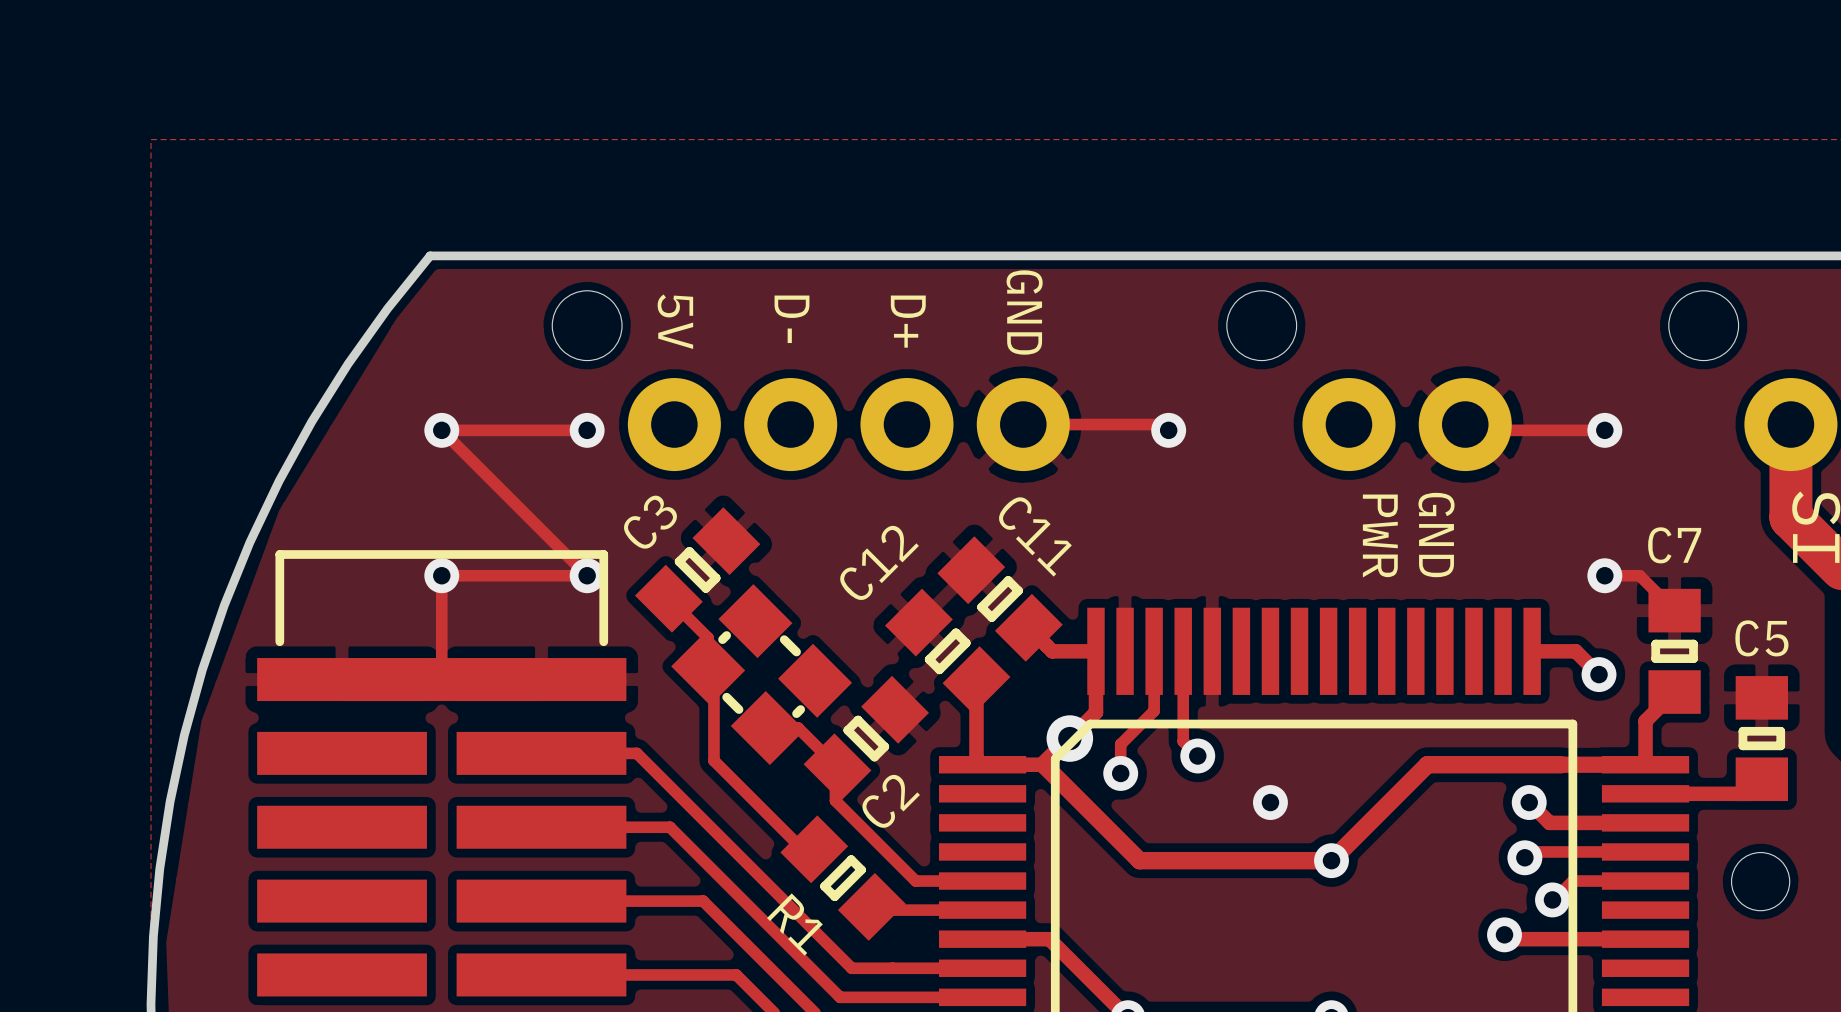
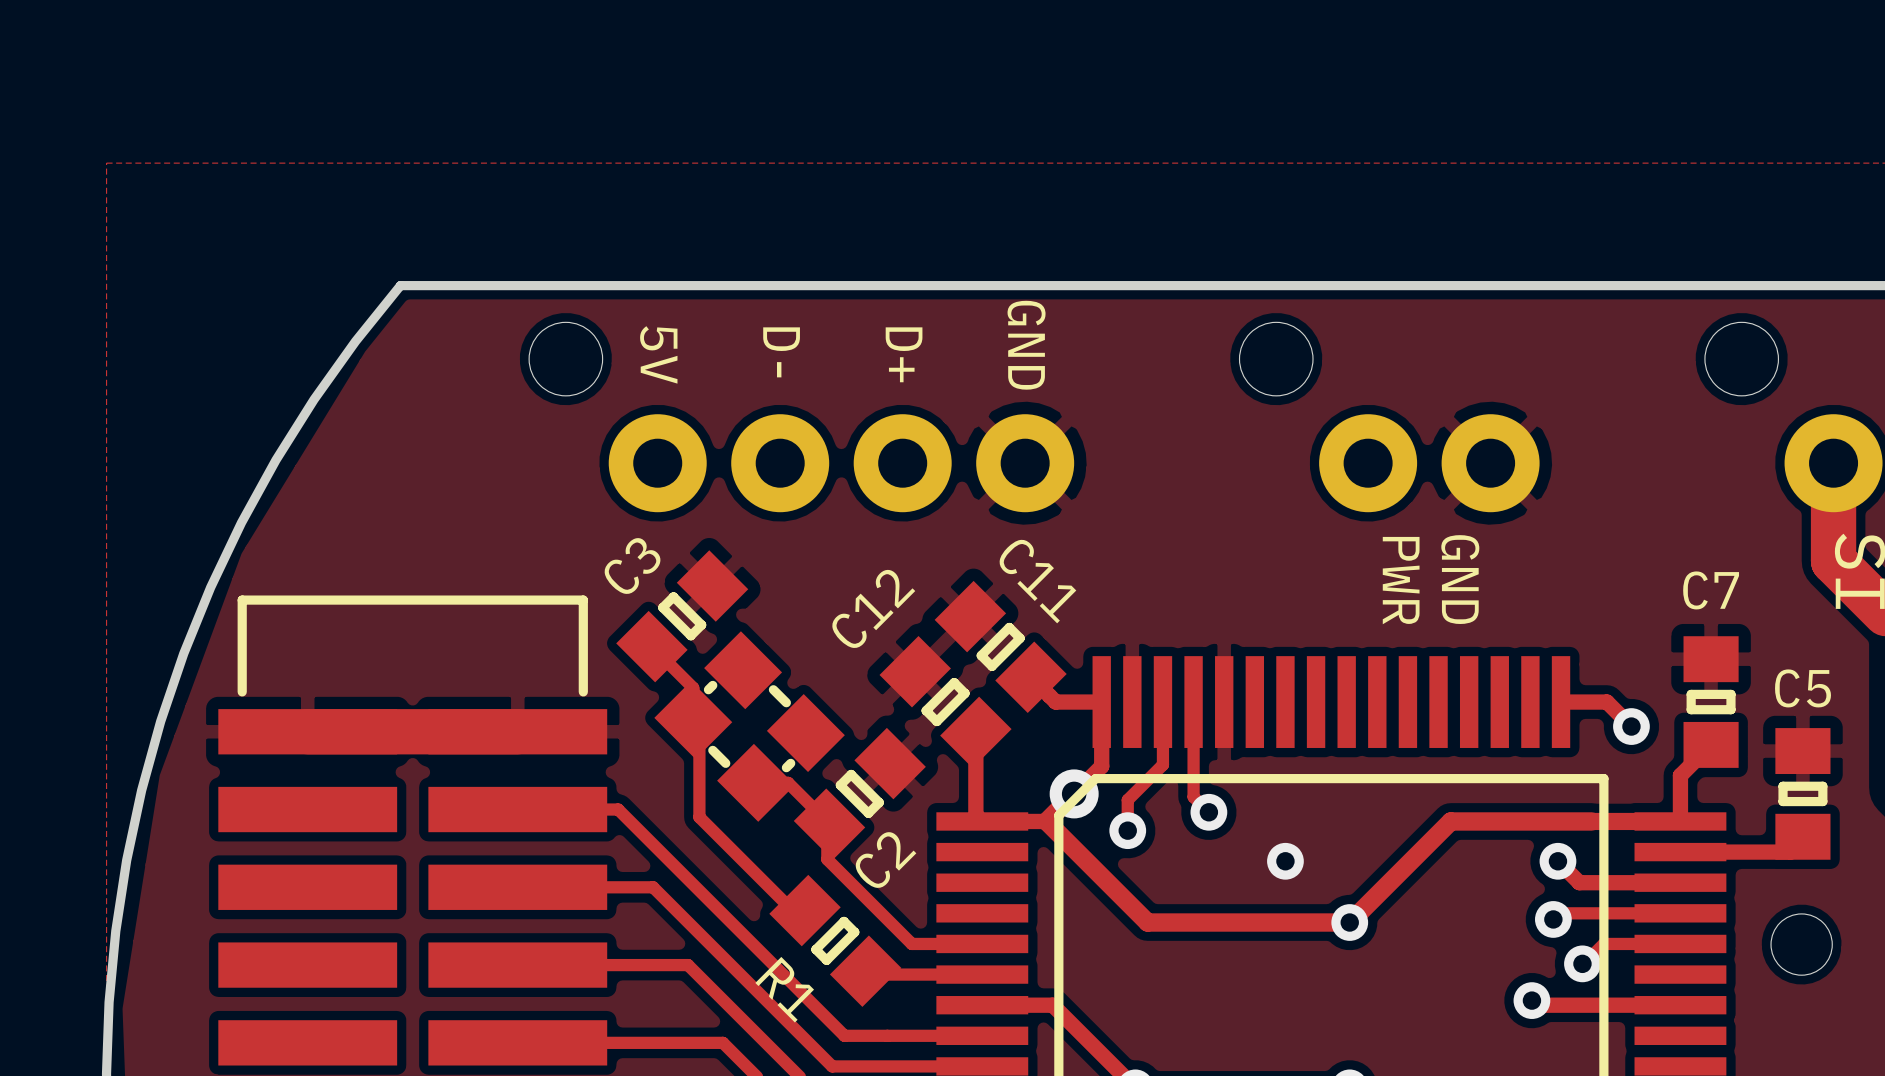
track: (1023, 424) (1162, 424) (1168, 430) -> none
track: (1465, 424) (1471, 430) (1604, 430) -> none
via: (441, 430) -> none
track: (587, 430) (441, 430) (587, 575) (441, 575) (441, 679) -> none
via: (587, 430) -> none
via: (1168, 430) -> none
via: (1604, 430) -> none
via: (441, 575) -> none
via: (587, 575) -> none
track: (1604, 575) (1639, 575) (1674, 610) -> none
via: (1604, 575) -> none

